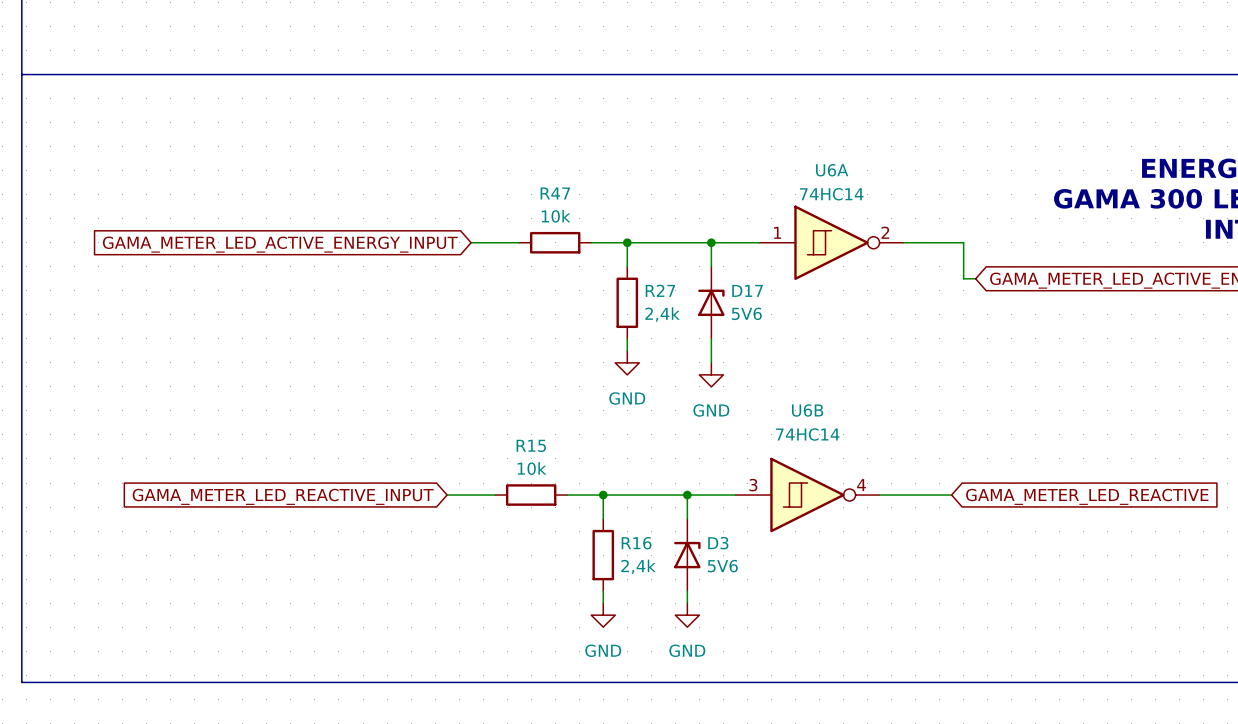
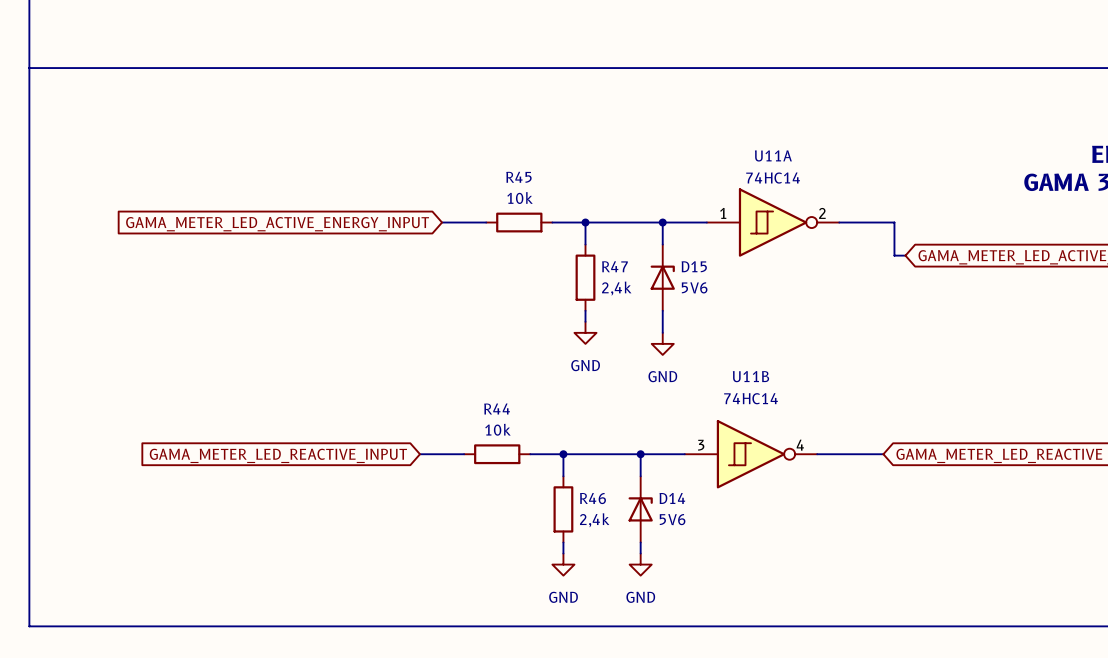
U6A name: U6A (832, 170) -> U11A (773, 155)
R47 name: R47 (555, 193) -> R45 (518, 177)
R27 name: R27 (660, 290) -> R47 (614, 266)
D17 name: D17 (747, 290) -> D15 (694, 266)
U6B name: U6B (807, 410) -> U11B (750, 376)
R15 name: R15 (531, 445) -> R44 (497, 408)
R16 name: R16 (636, 543) -> R46 (592, 498)
D3 name: D3 (718, 543) -> D14 (672, 498)

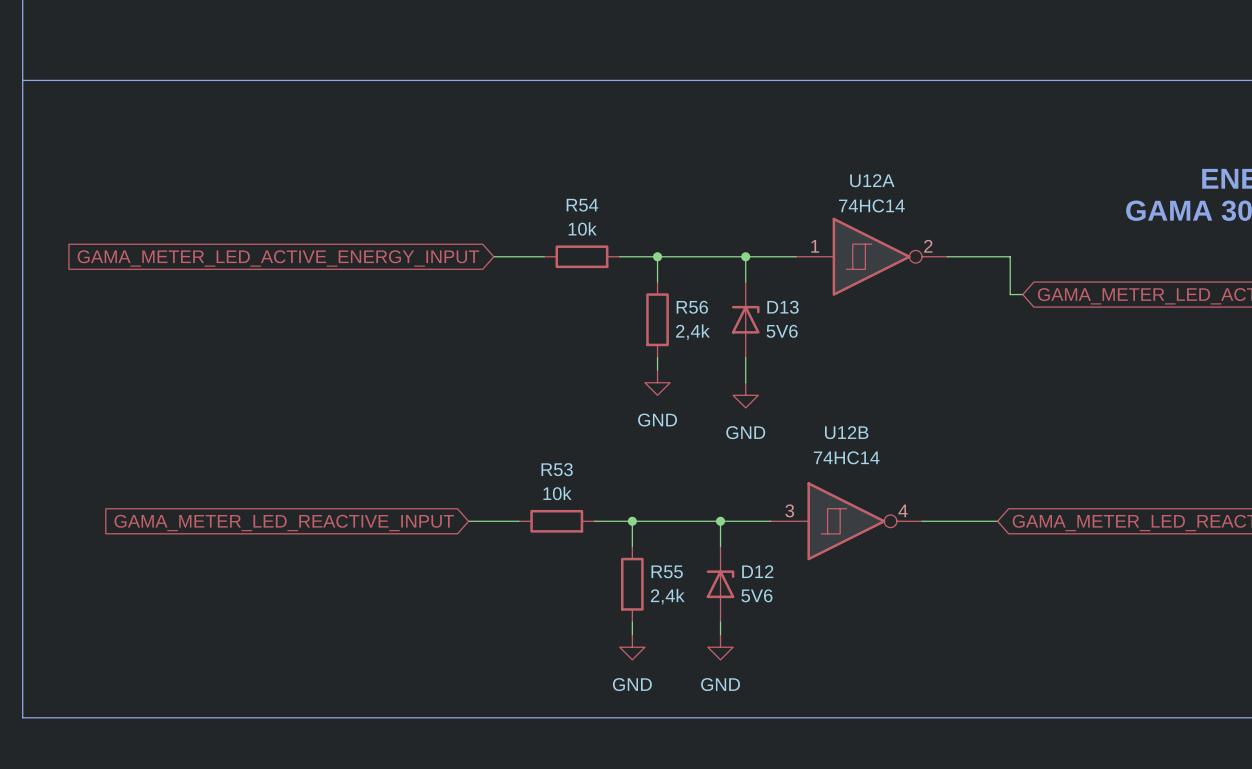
U11A name: U11A (773, 155) -> U12A (872, 180)
R45 name: R45 (518, 177) -> R54 (582, 205)
R47 name: R47 (614, 266) -> R56 (692, 307)
D15 name: D15 (694, 266) -> D13 (783, 307)
U11B name: U11B (750, 376) -> U12B (846, 432)
R44 name: R44 (497, 408) -> R53 (557, 469)
R46 name: R46 (592, 498) -> R55 (667, 571)
D14 name: D14 (672, 498) -> D12 (757, 571)

